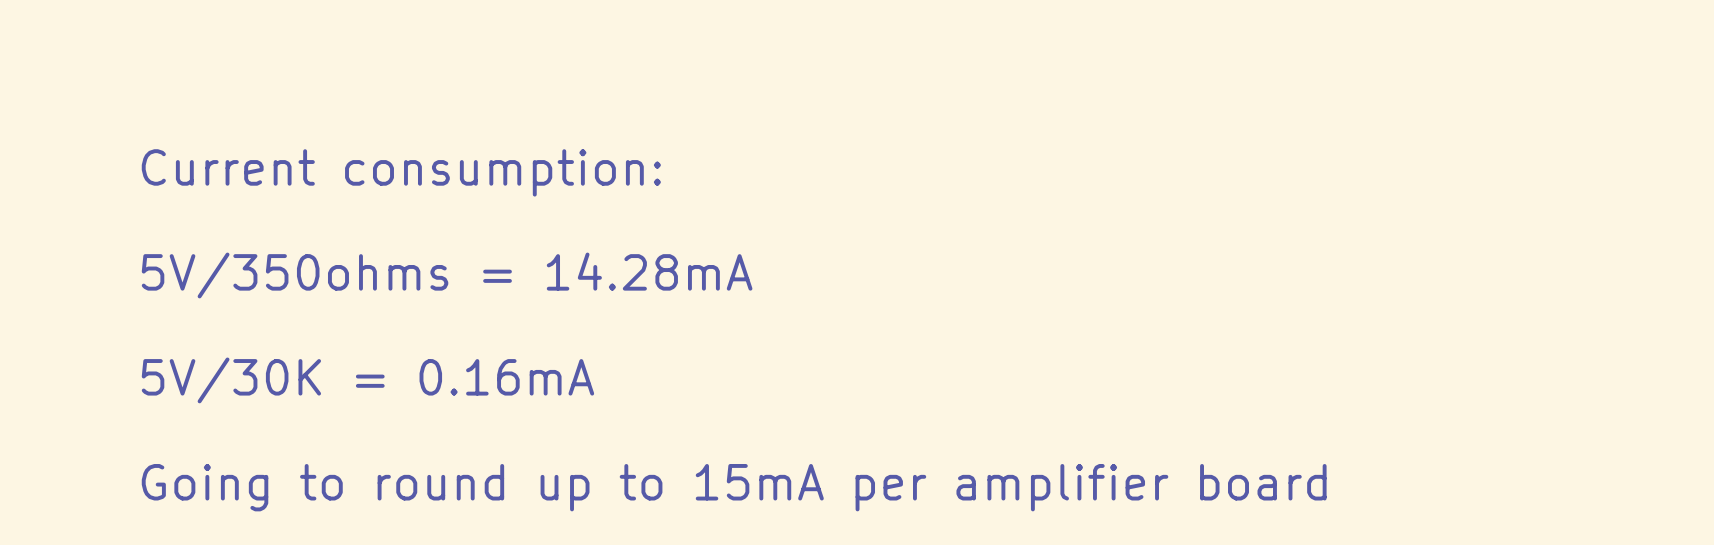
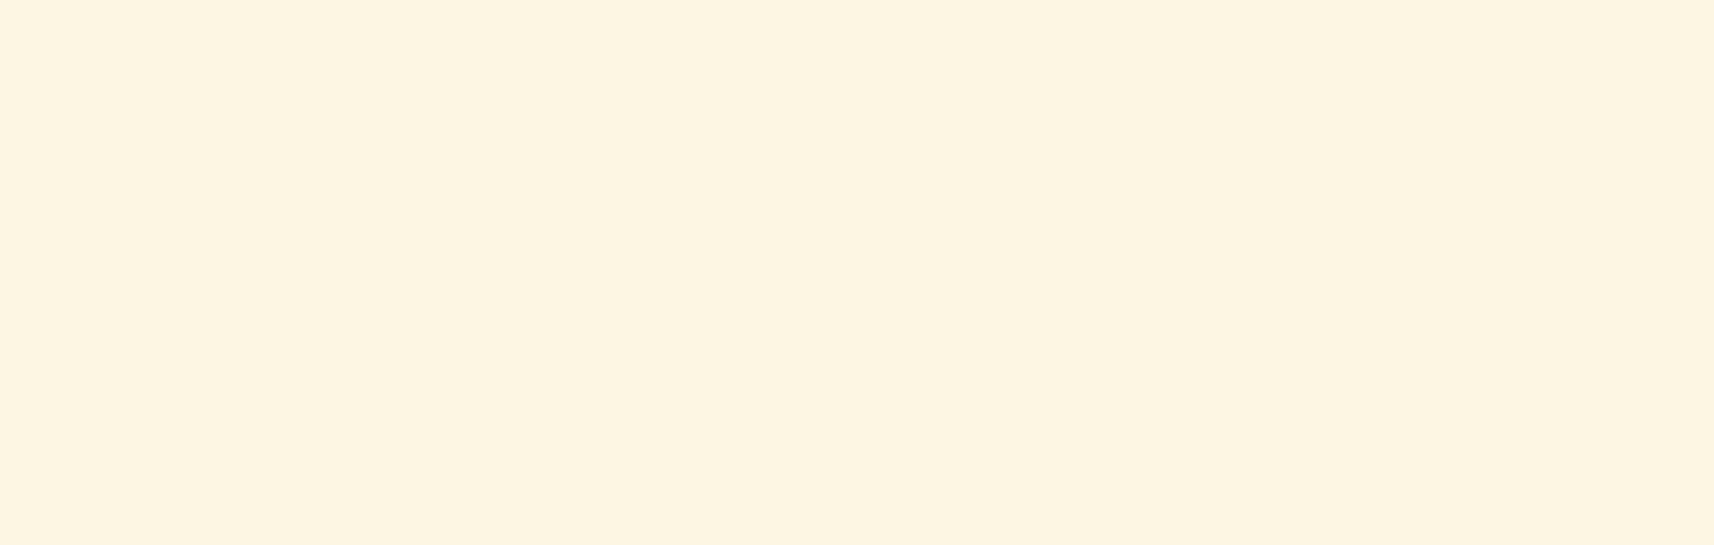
text: Current consumption: (401, 172) -> none
text: 5V/350ohms = 14.28mA (447, 275) -> none
text: 5V/30K = 0.16mA (367, 380) -> none
text: Going to round up to 15mA per amplifier board (734, 487) -> none

